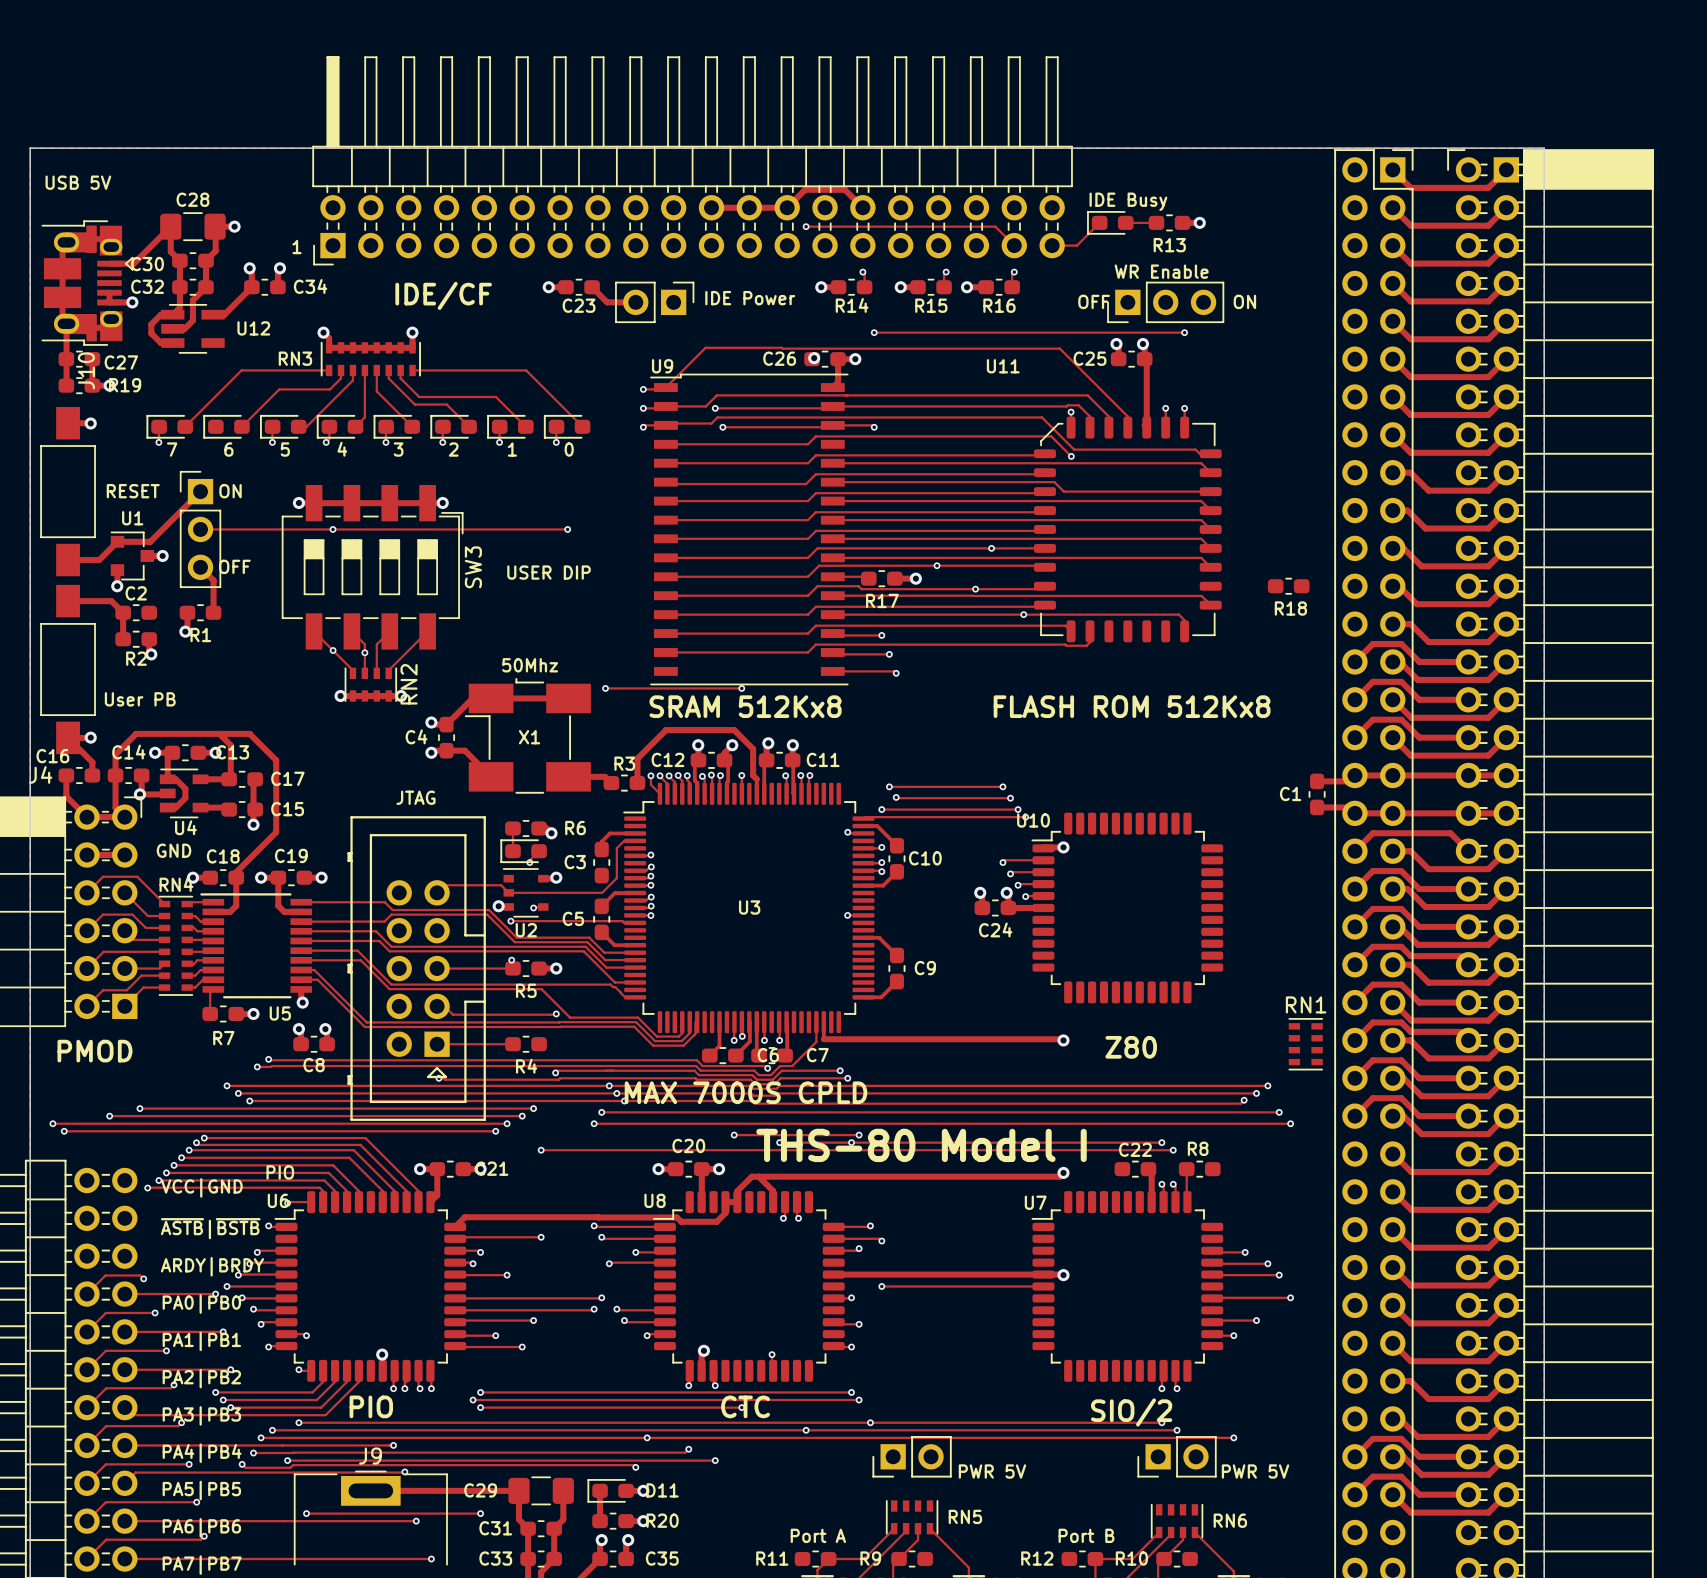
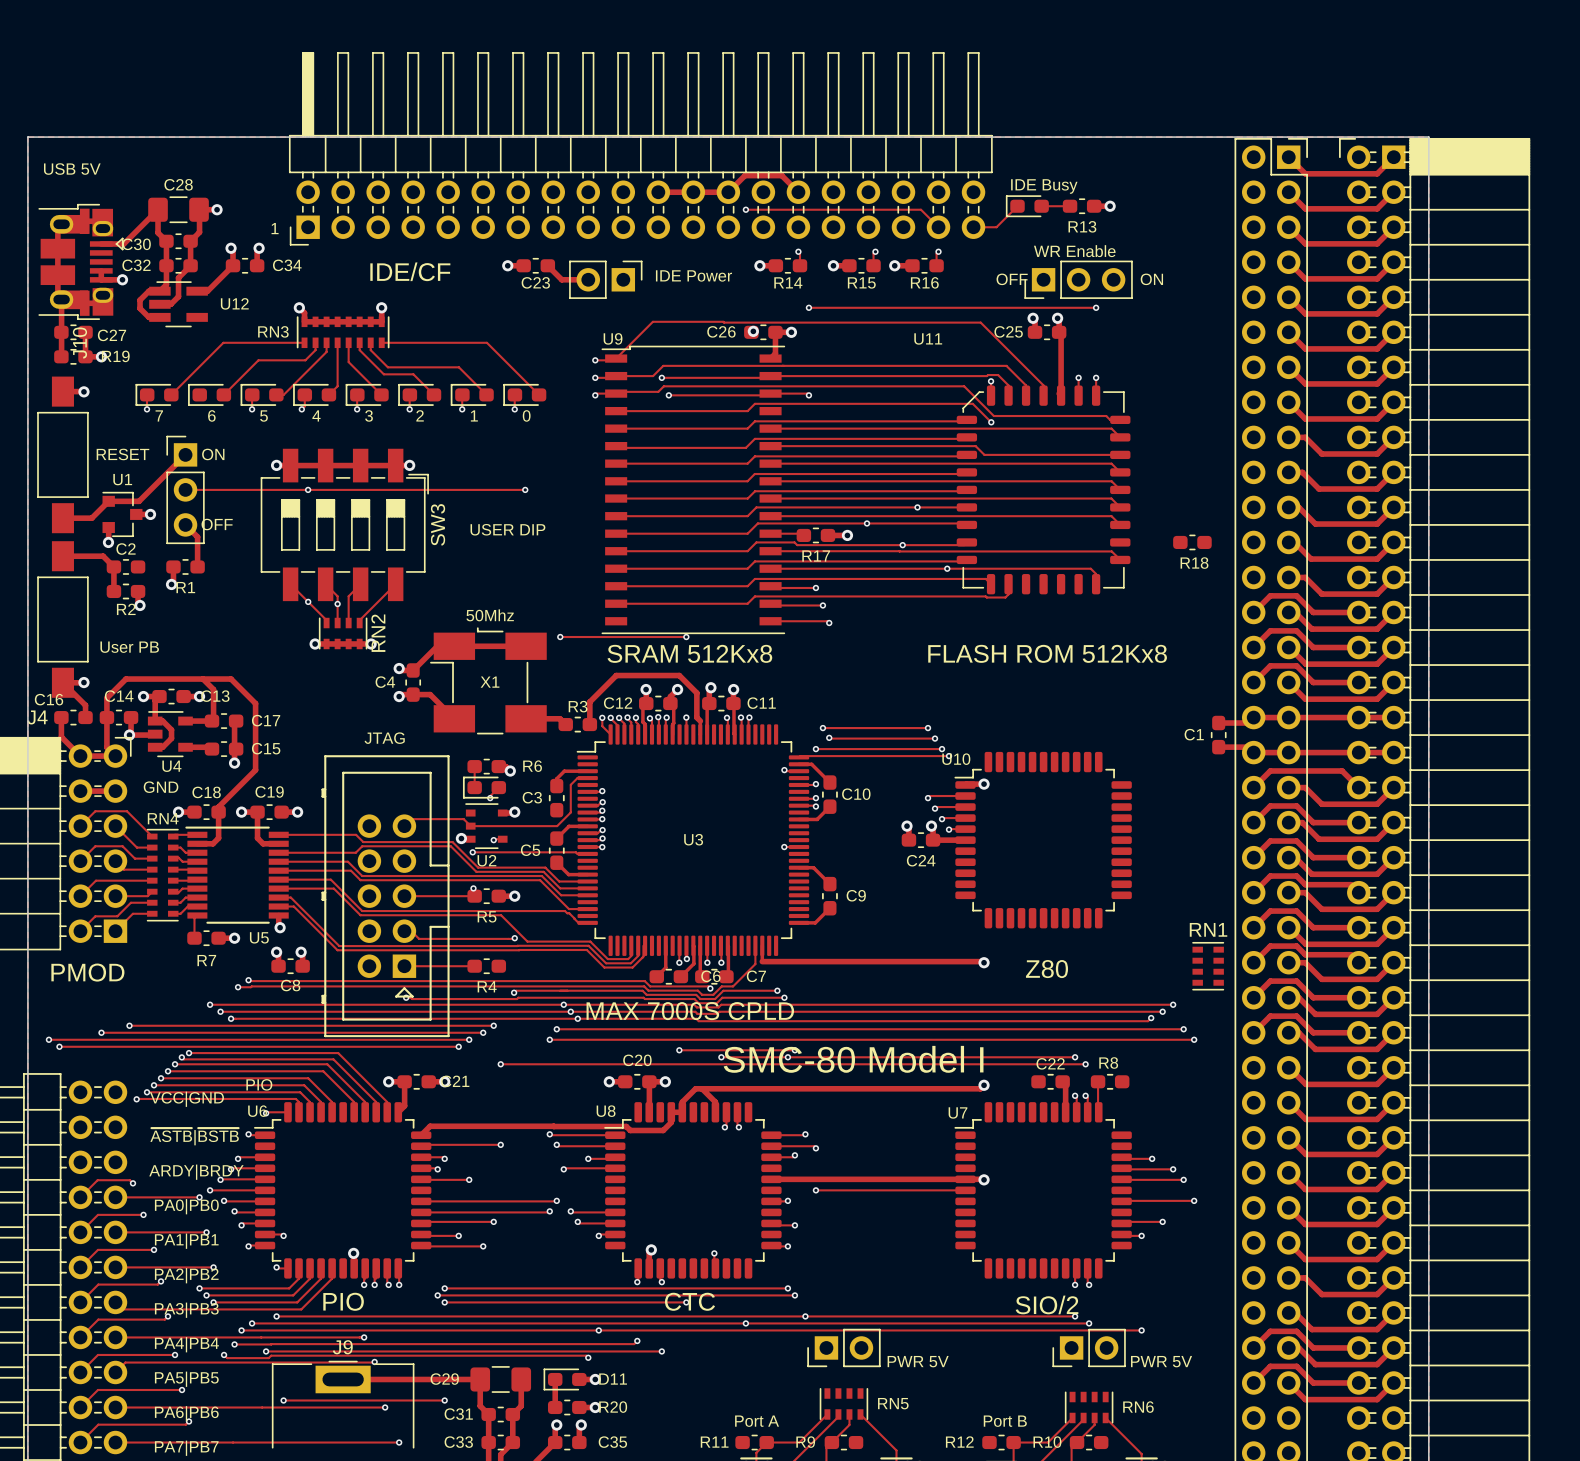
text: THS-80 Model I (921, 1145) -> SMC-80 Model I (853, 1059)

